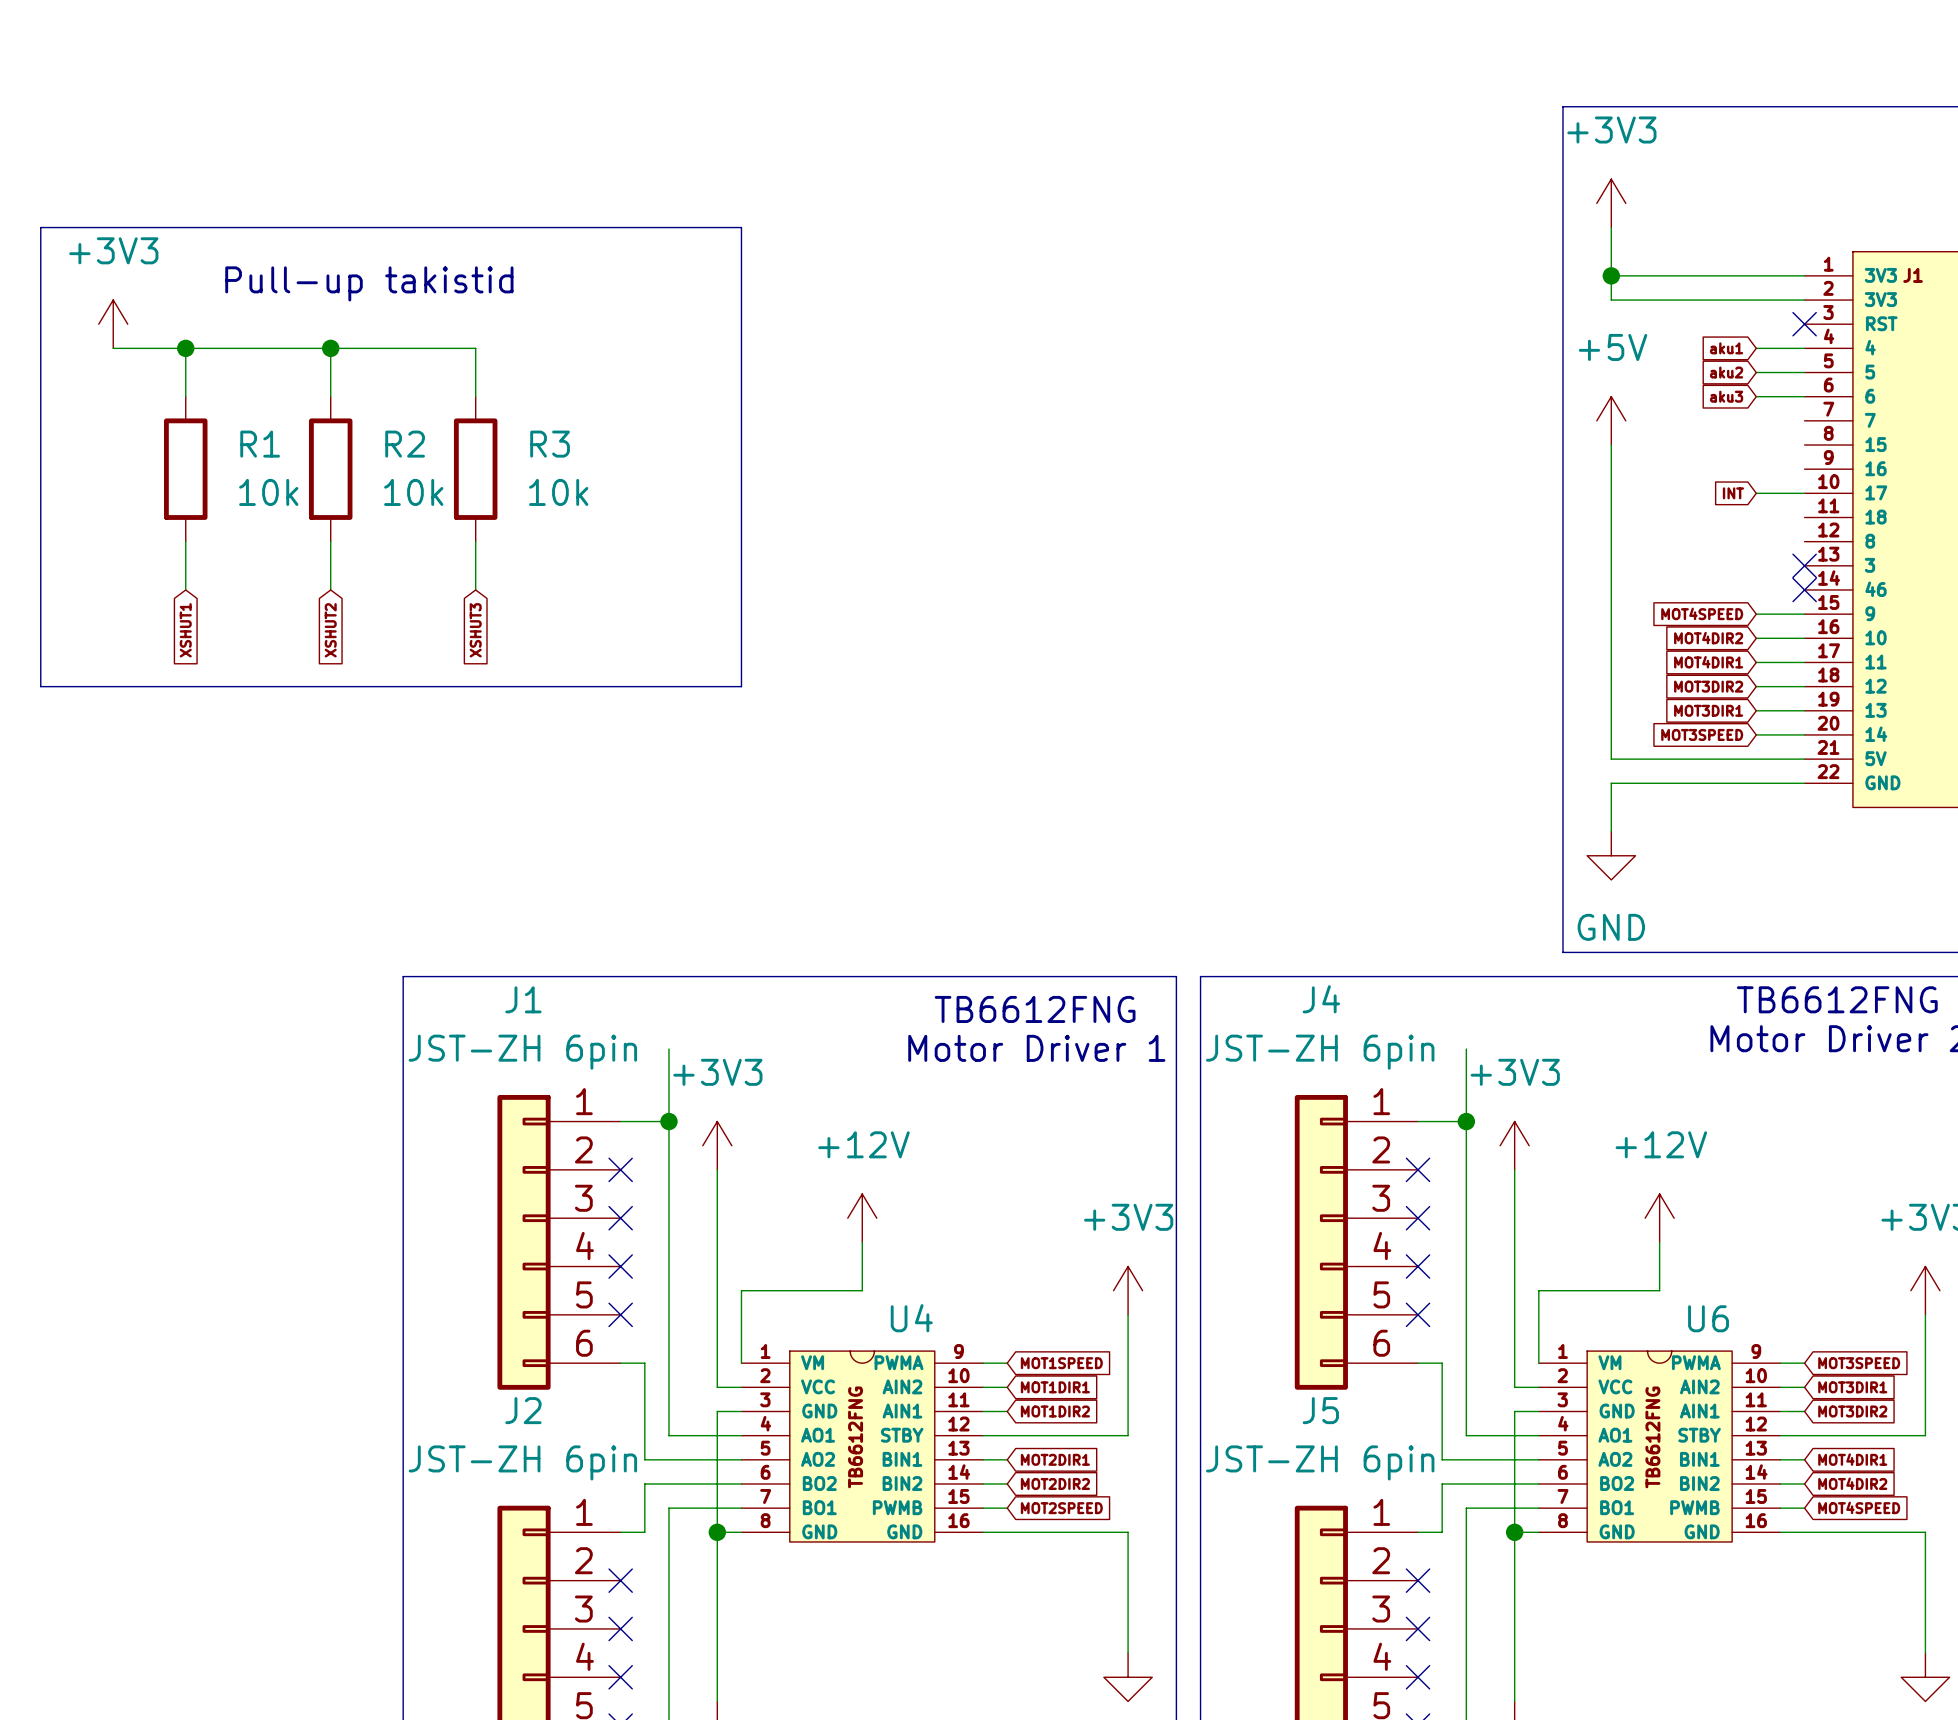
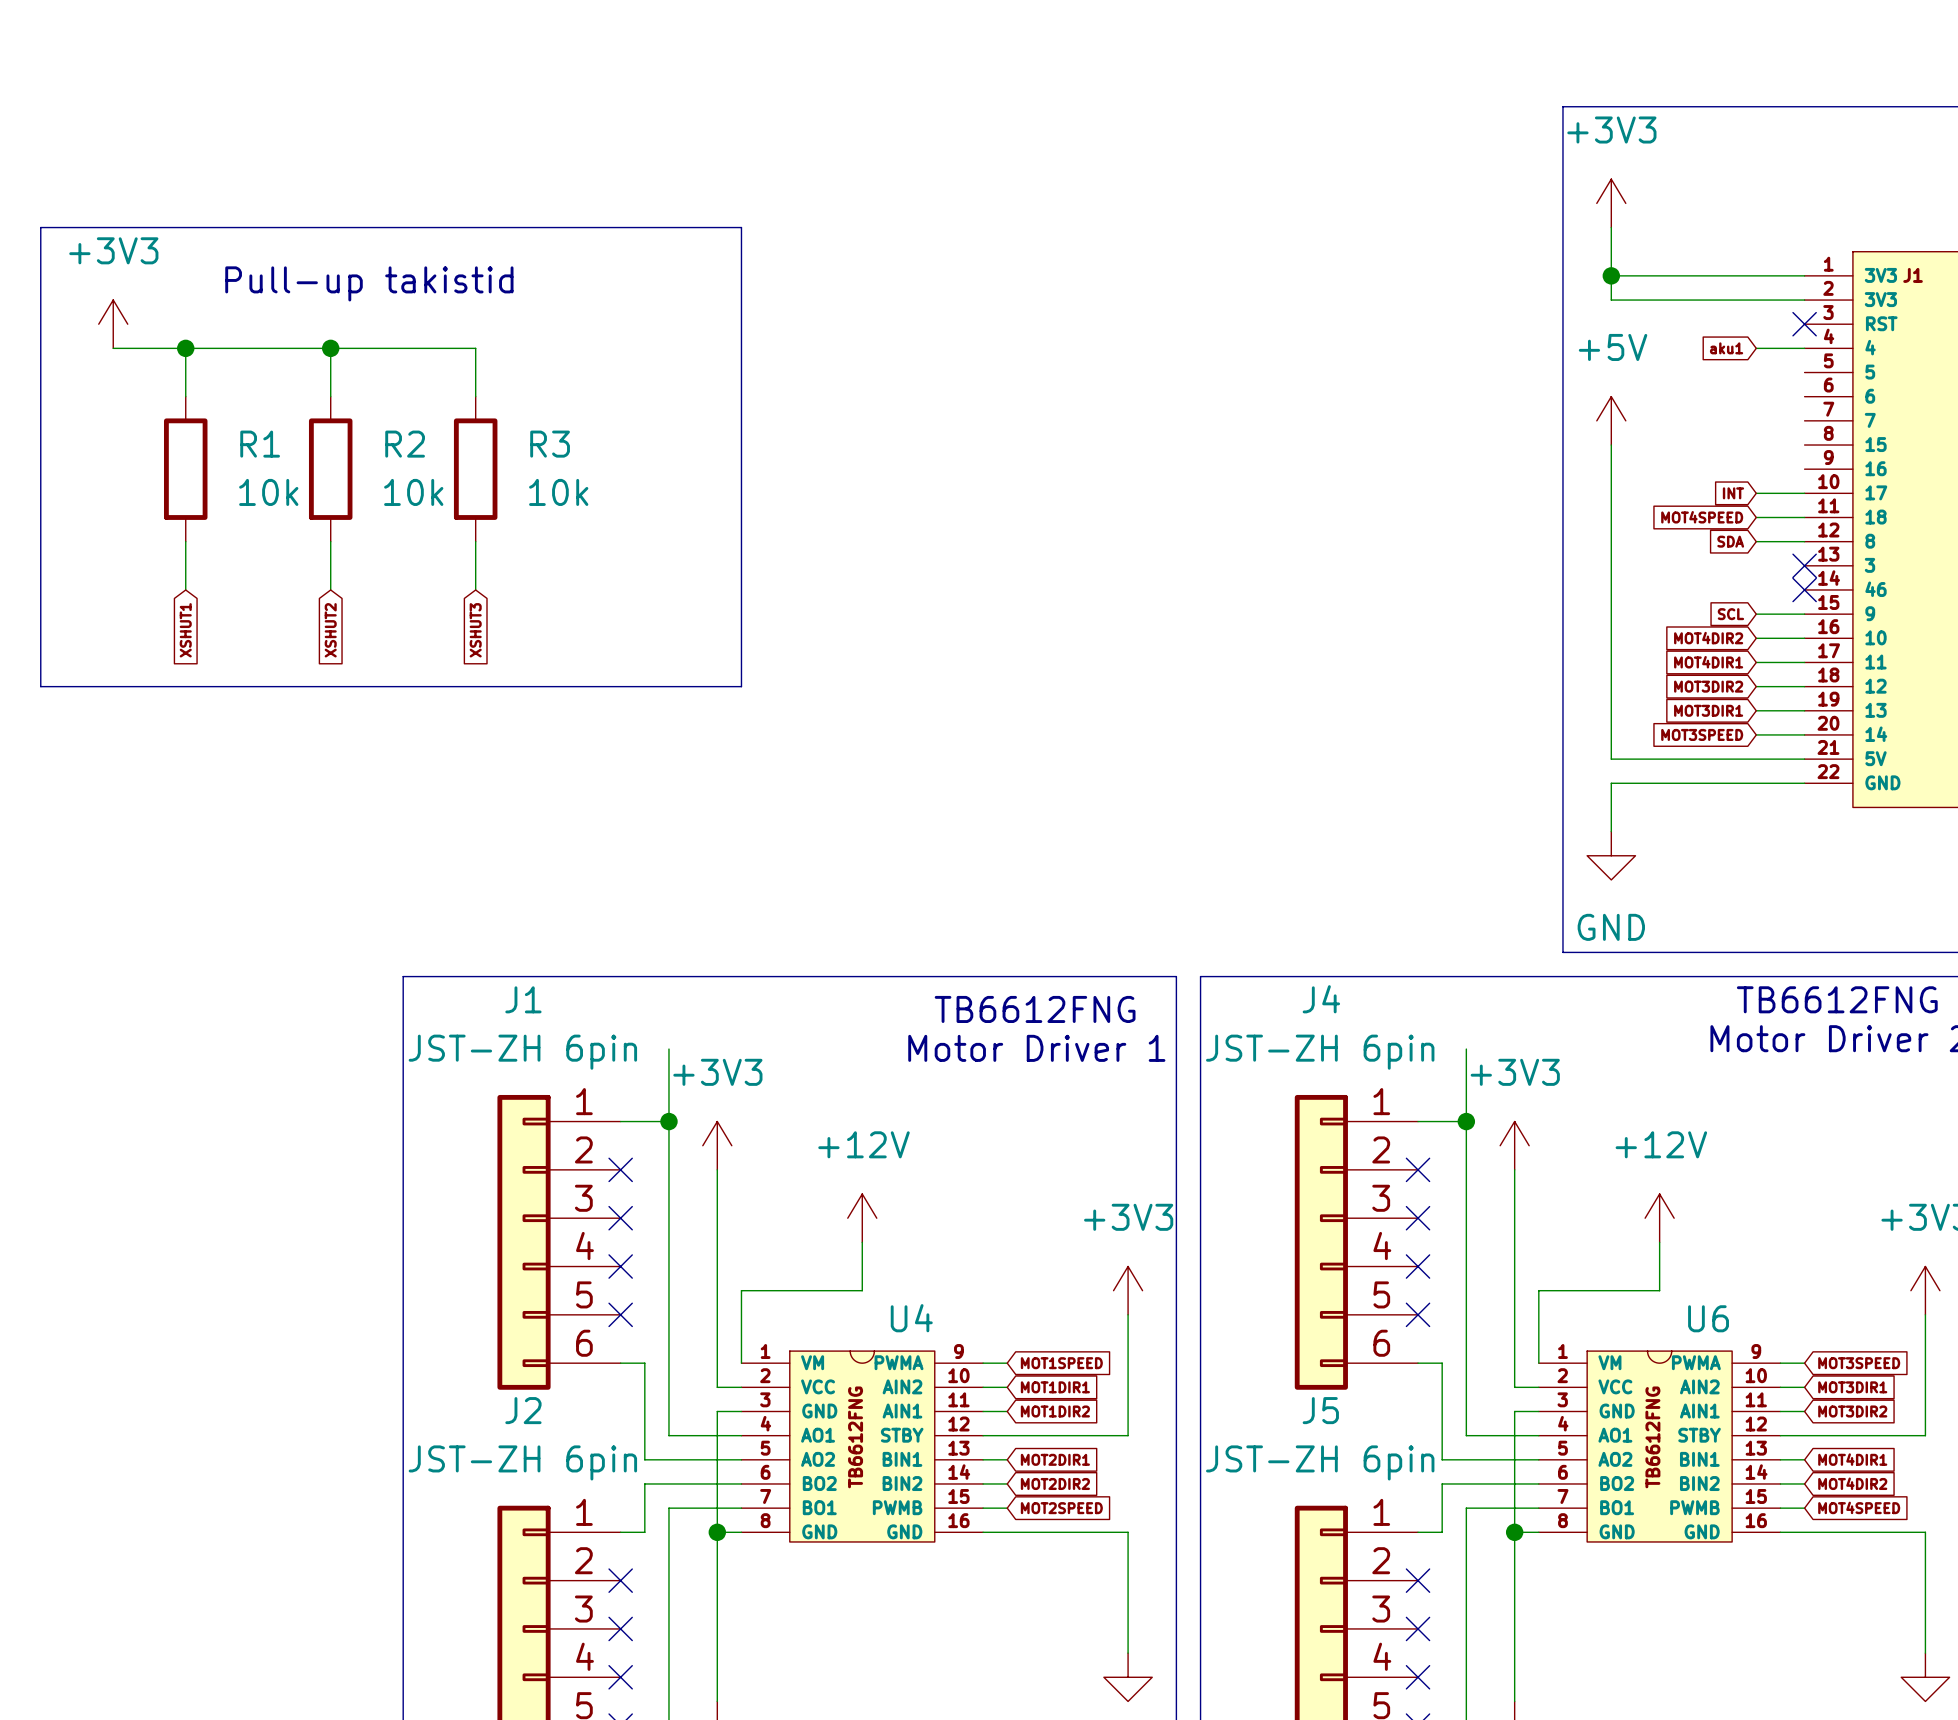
global label: aku2 (1726, 372) -> none
wire: (1756, 372) (1804, 372) -> (1756, 541) (1804, 541)
global label: aku3 (1726, 396) -> none
wire: (1756, 396) (1804, 396) -> (1756, 517) (1804, 517)
global label: none -> MOT4SPEED (1702, 517)
global label: none -> SDA (1730, 541)
global label: MOT4SPEED (1702, 613) -> SCL (1730, 614)

